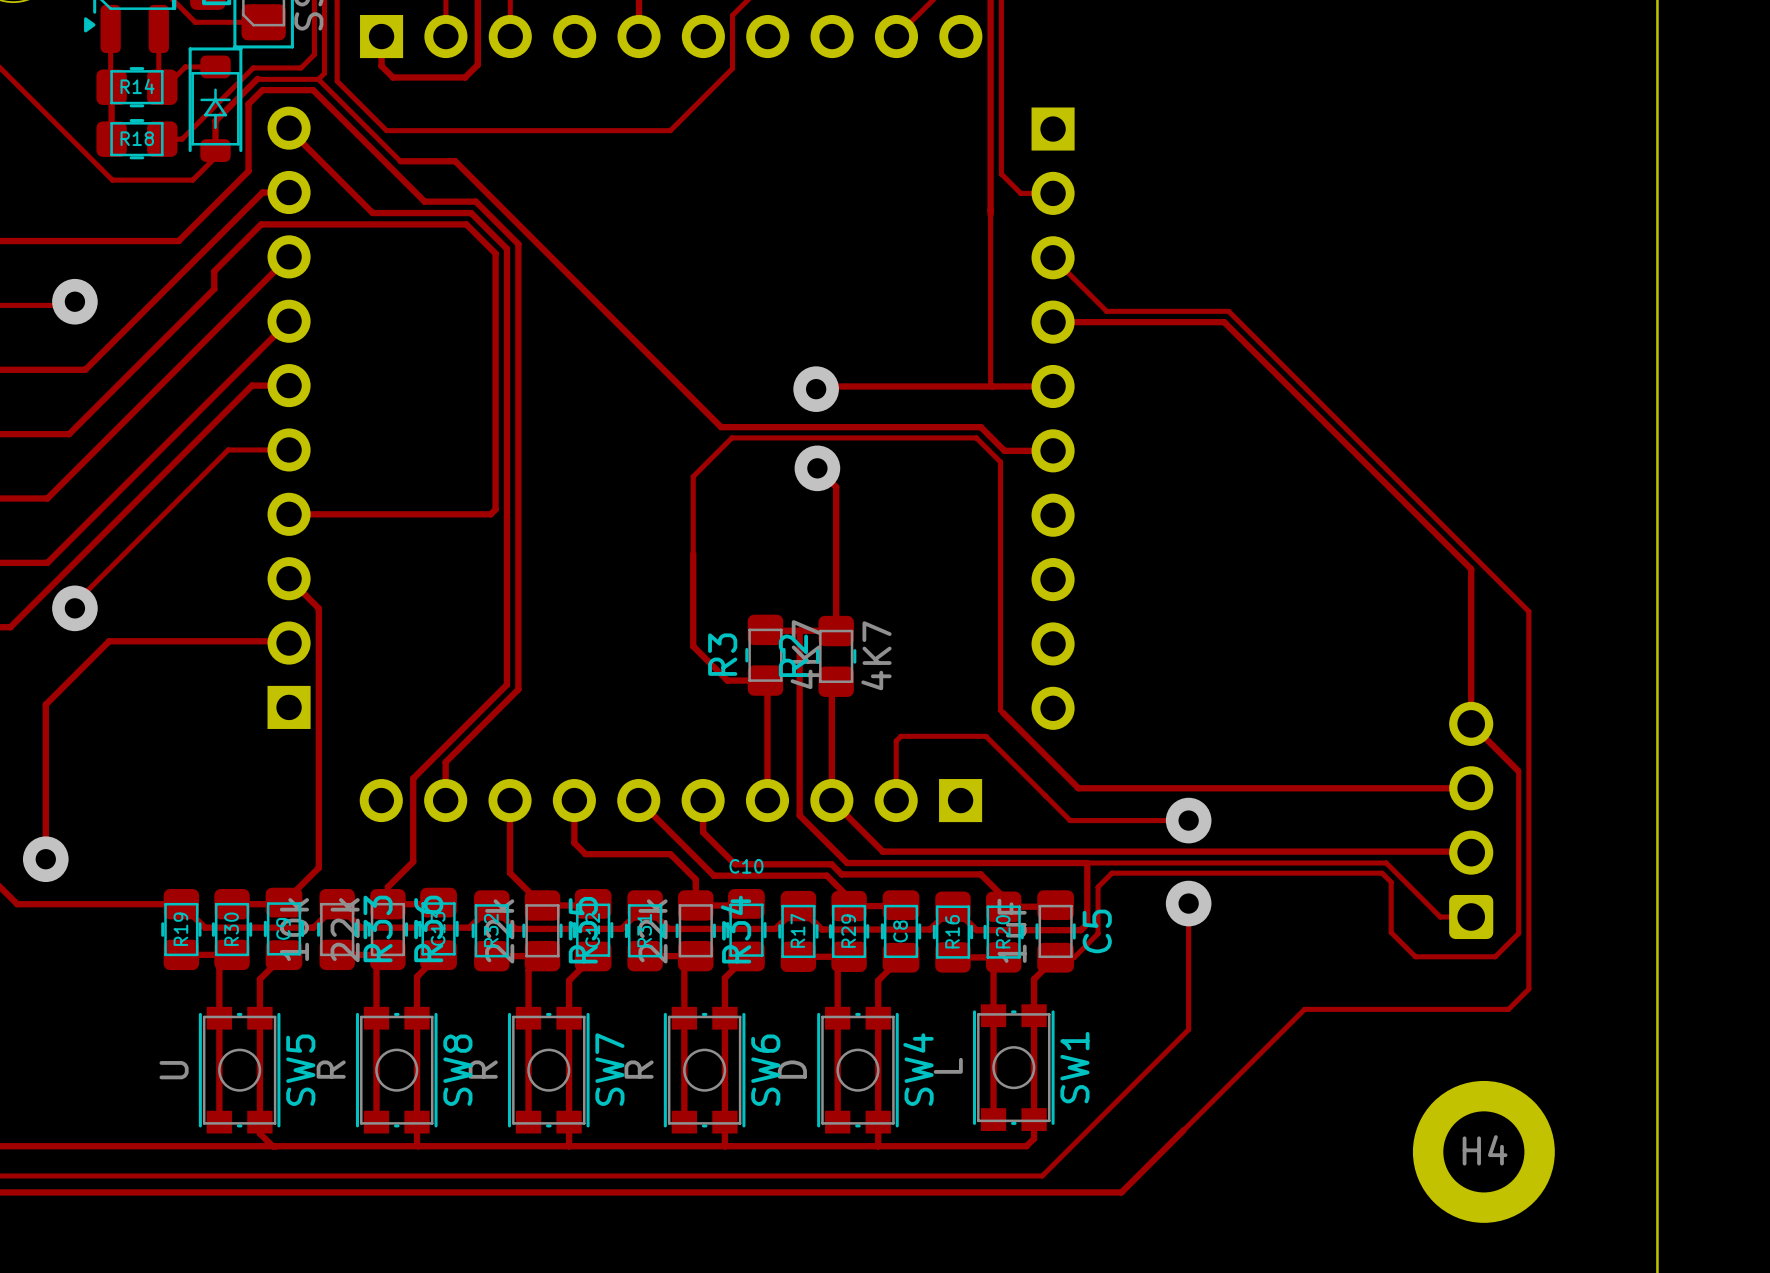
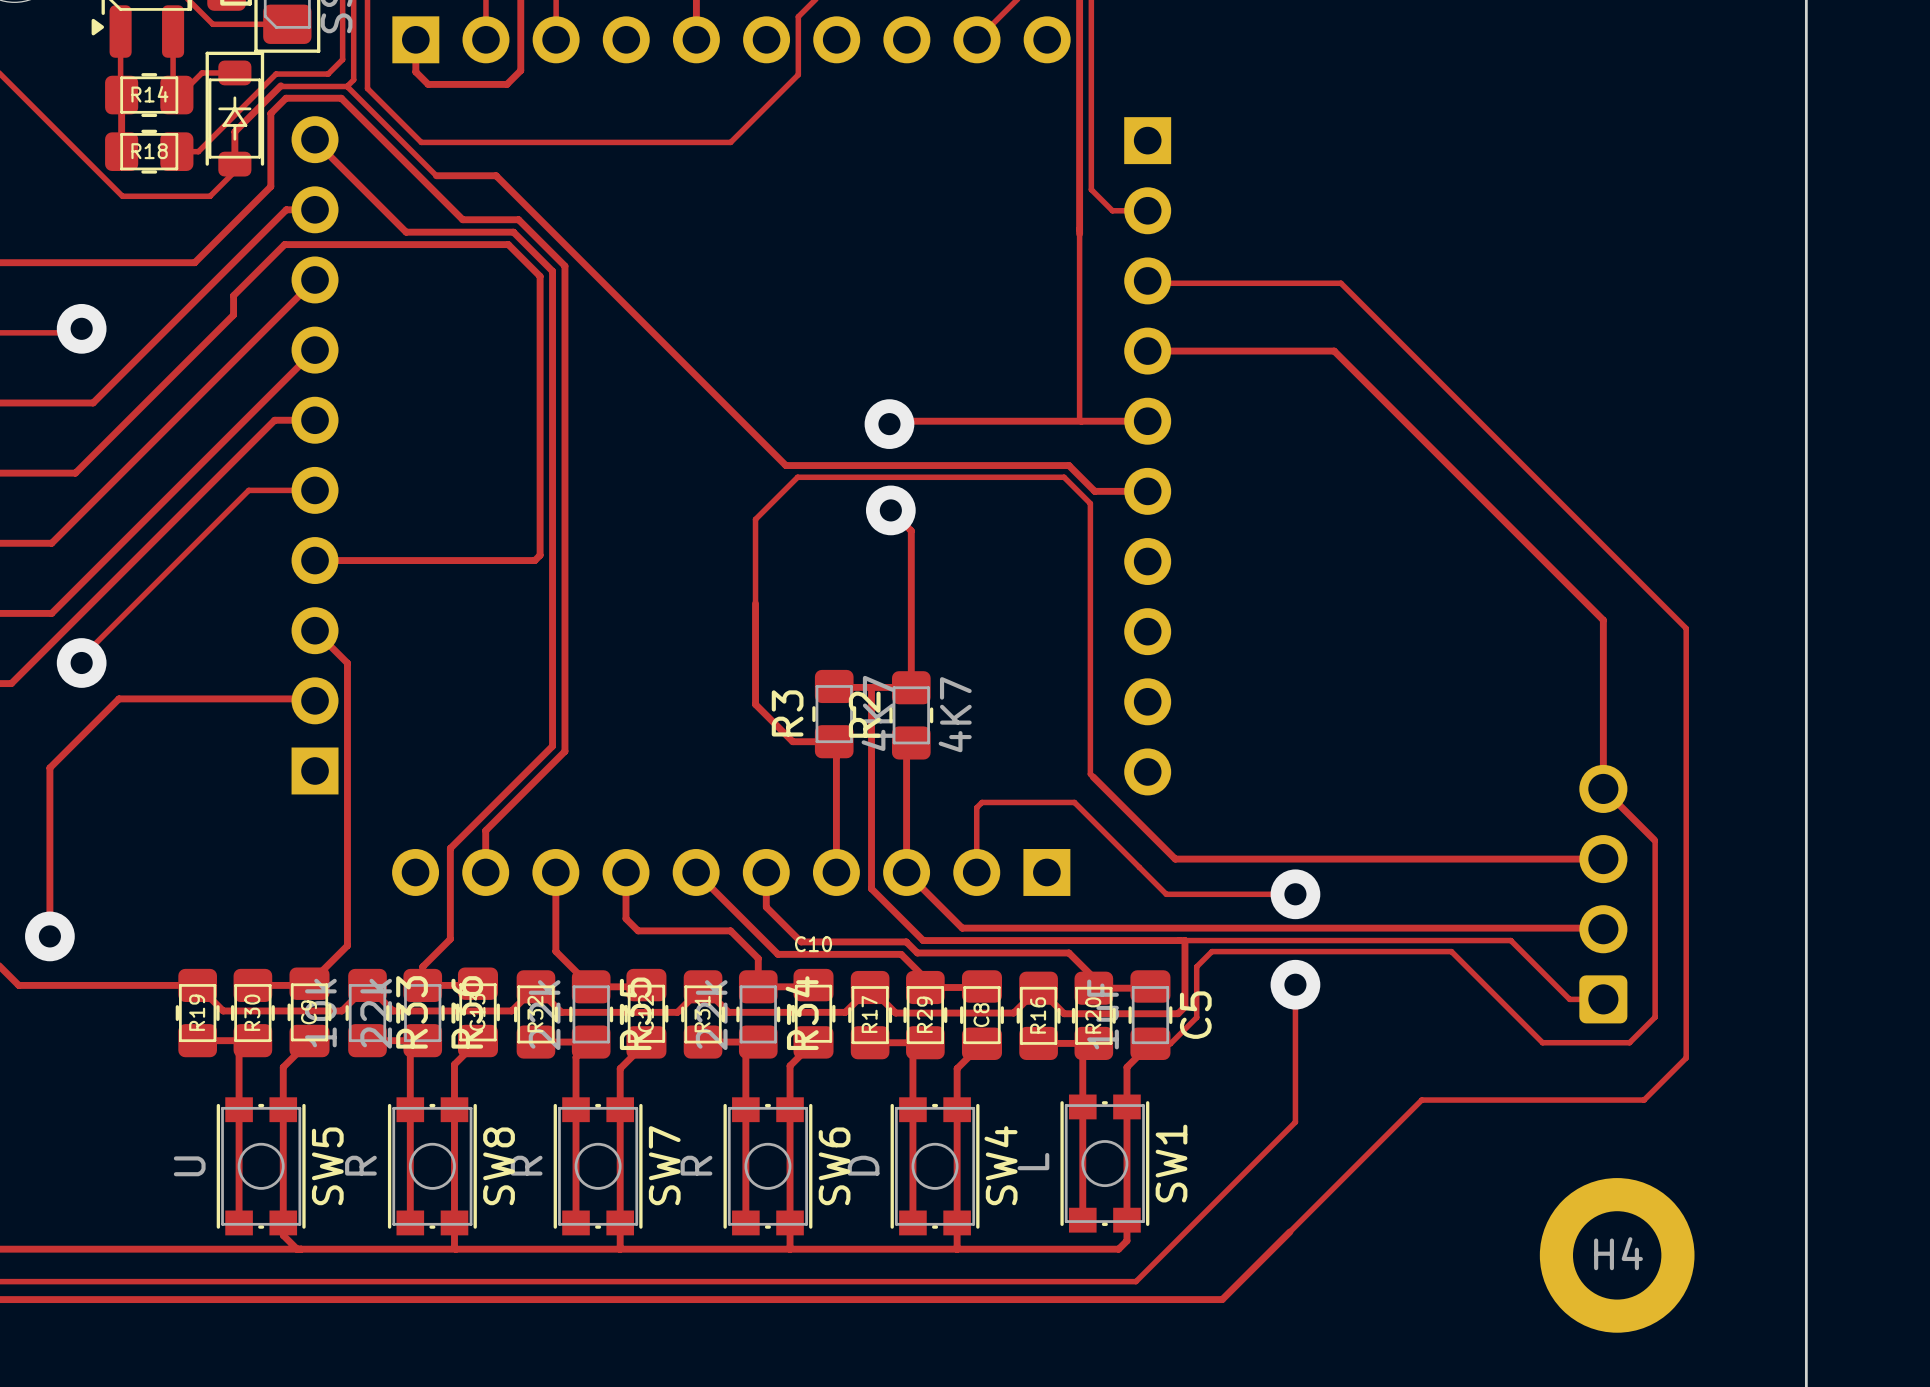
track: (1055, 259) (1106, 311) (1228, 311) (1528, 611) (1528, 989) -> (1150, 283) (1341, 283) (1686, 628) (1686, 1057) (1666, 1077)
track: (1331, 873) (1382, 873) (1391, 882) (1391, 932) -> (1451, 951) (1516, 1016)

